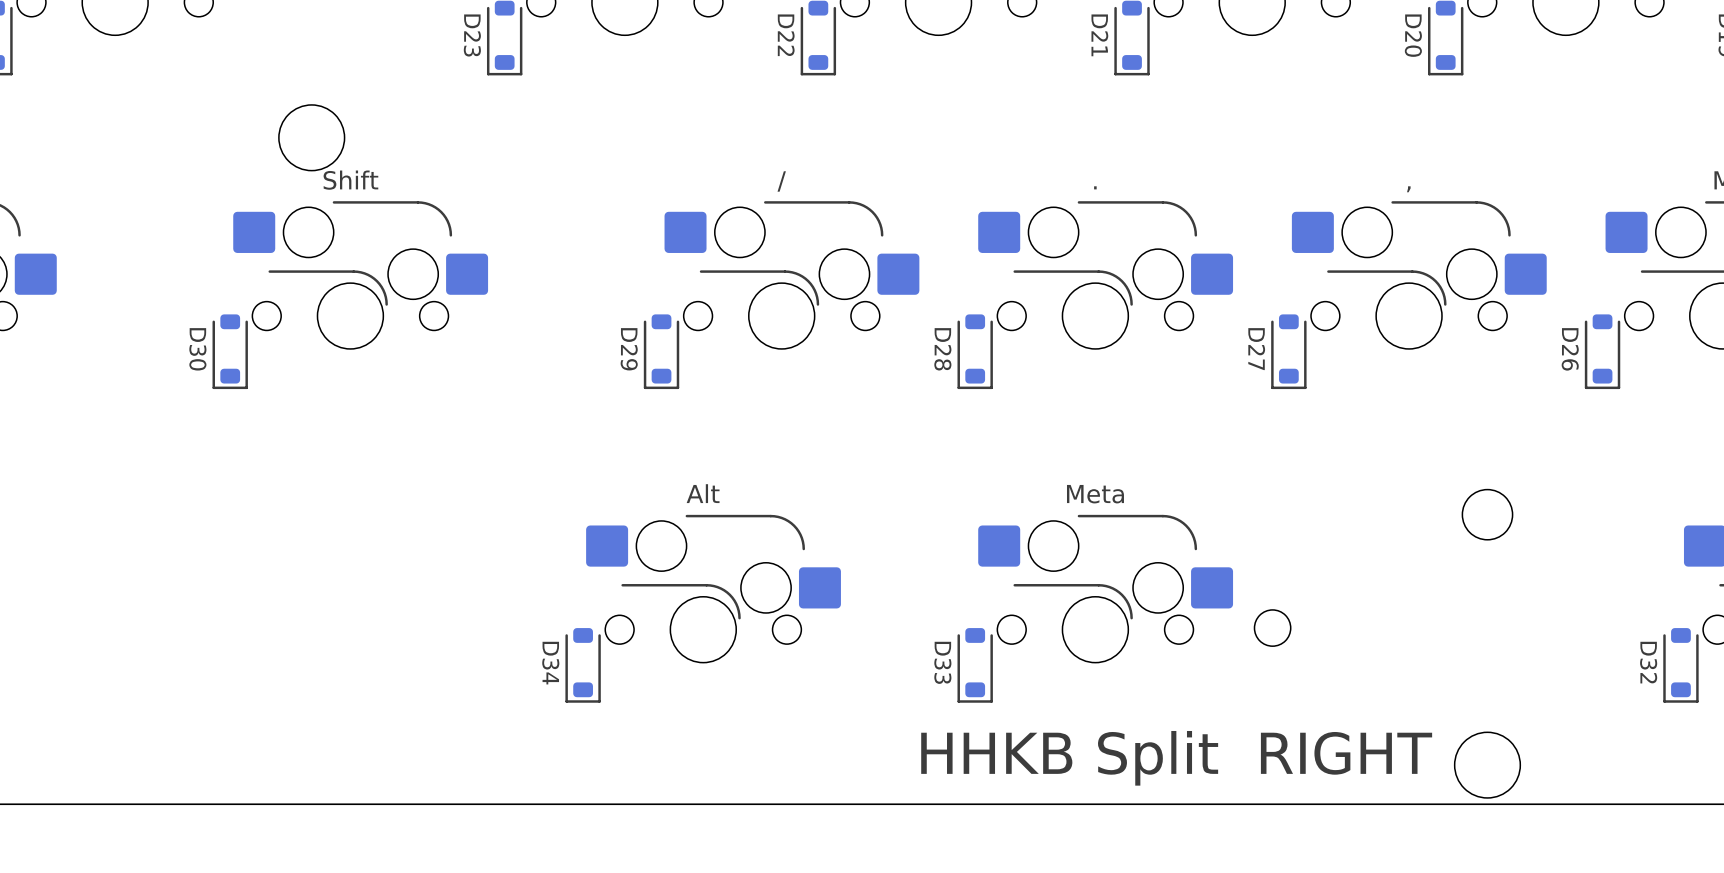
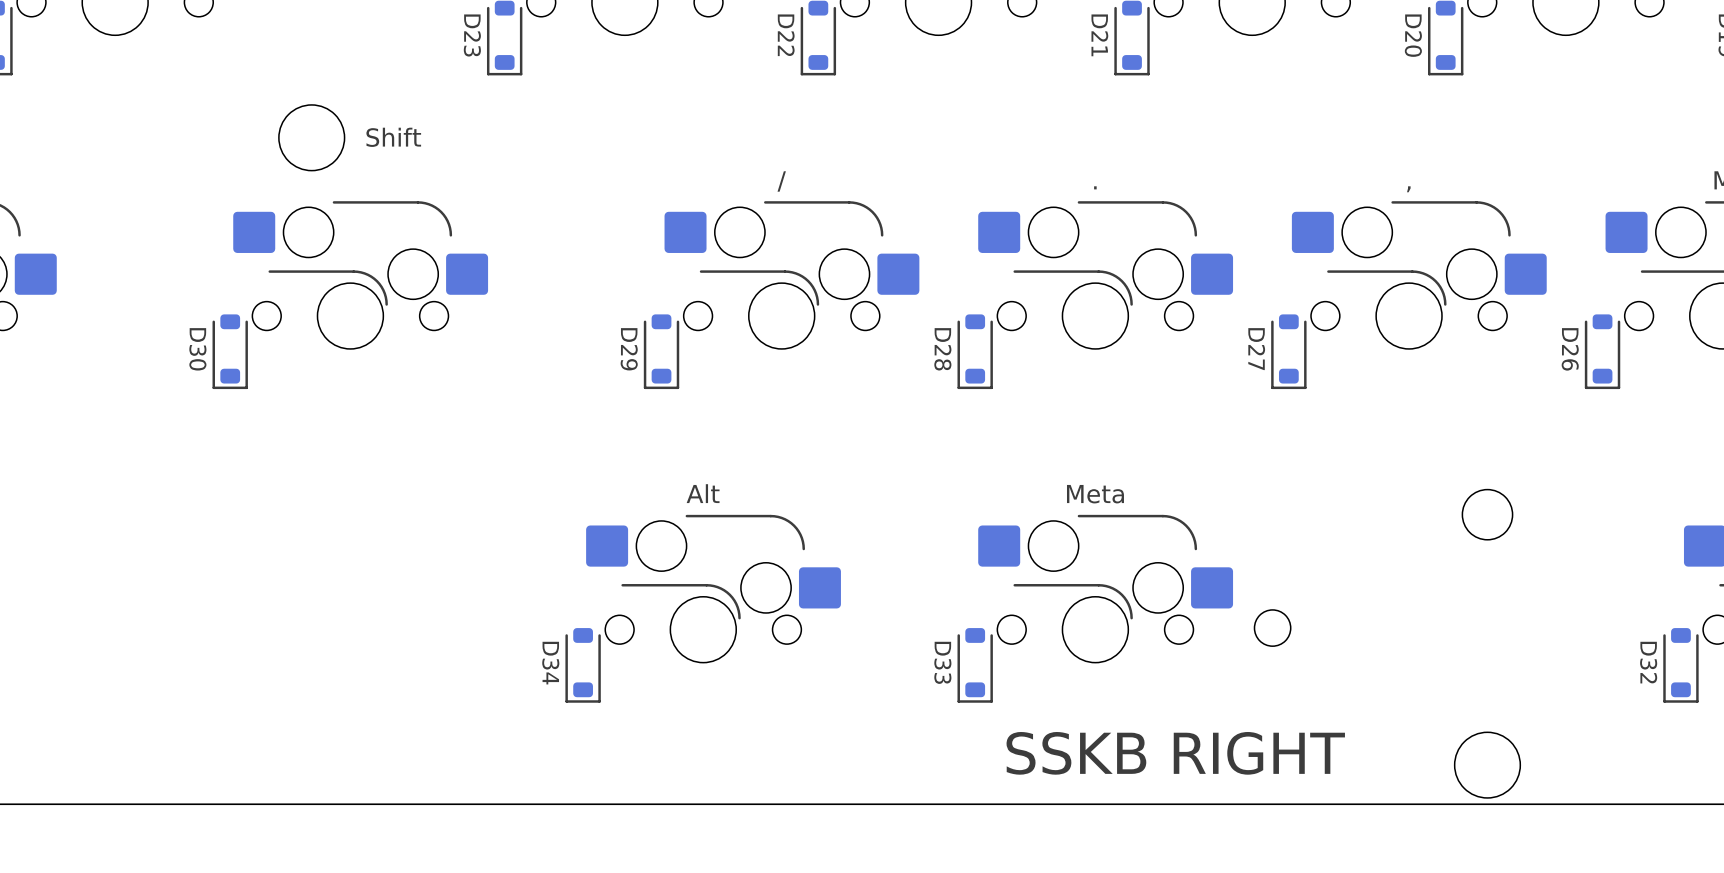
text position: Shift (350, 180) -> Shift (393, 137)
text: HHKB Split RIGHT (1176, 758) -> SSKB RIGHT (1175, 753)

